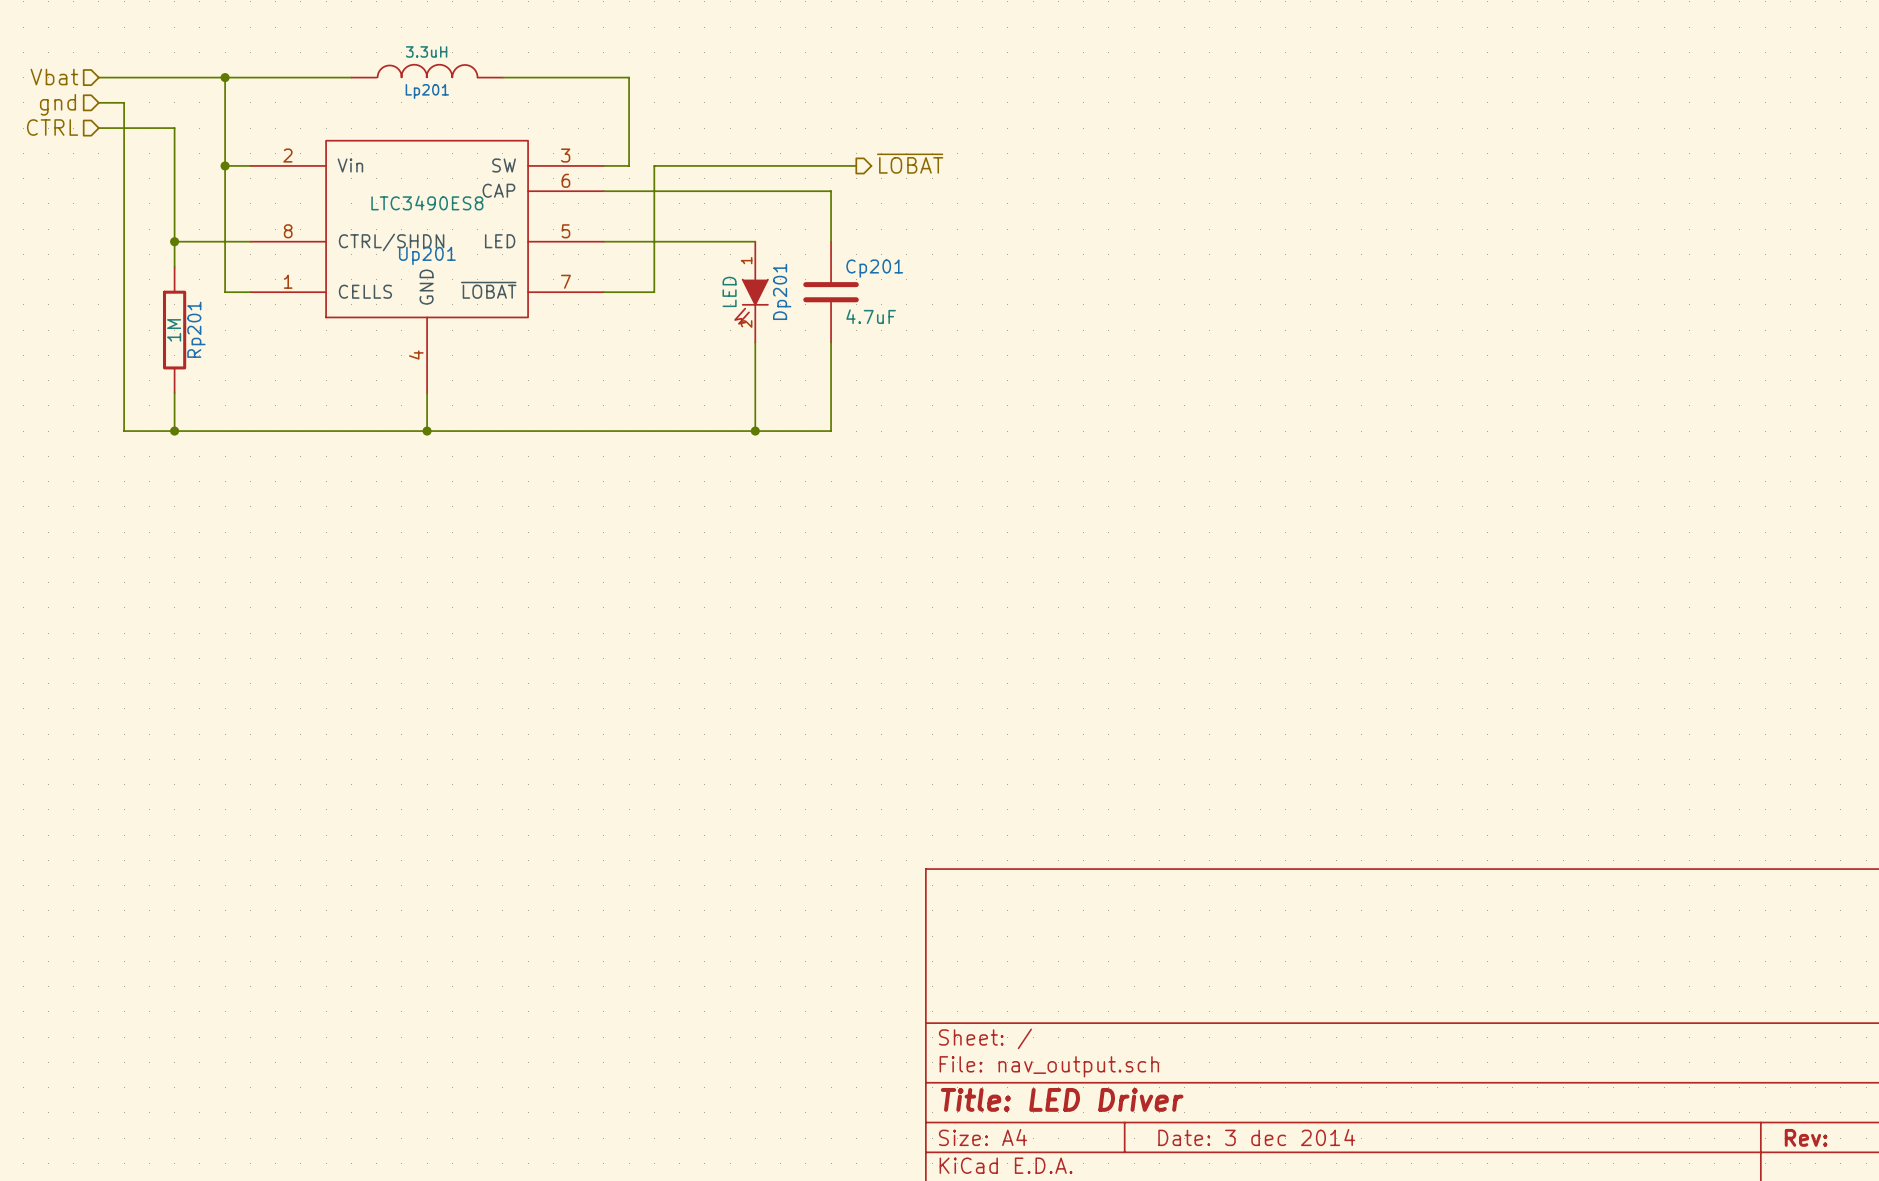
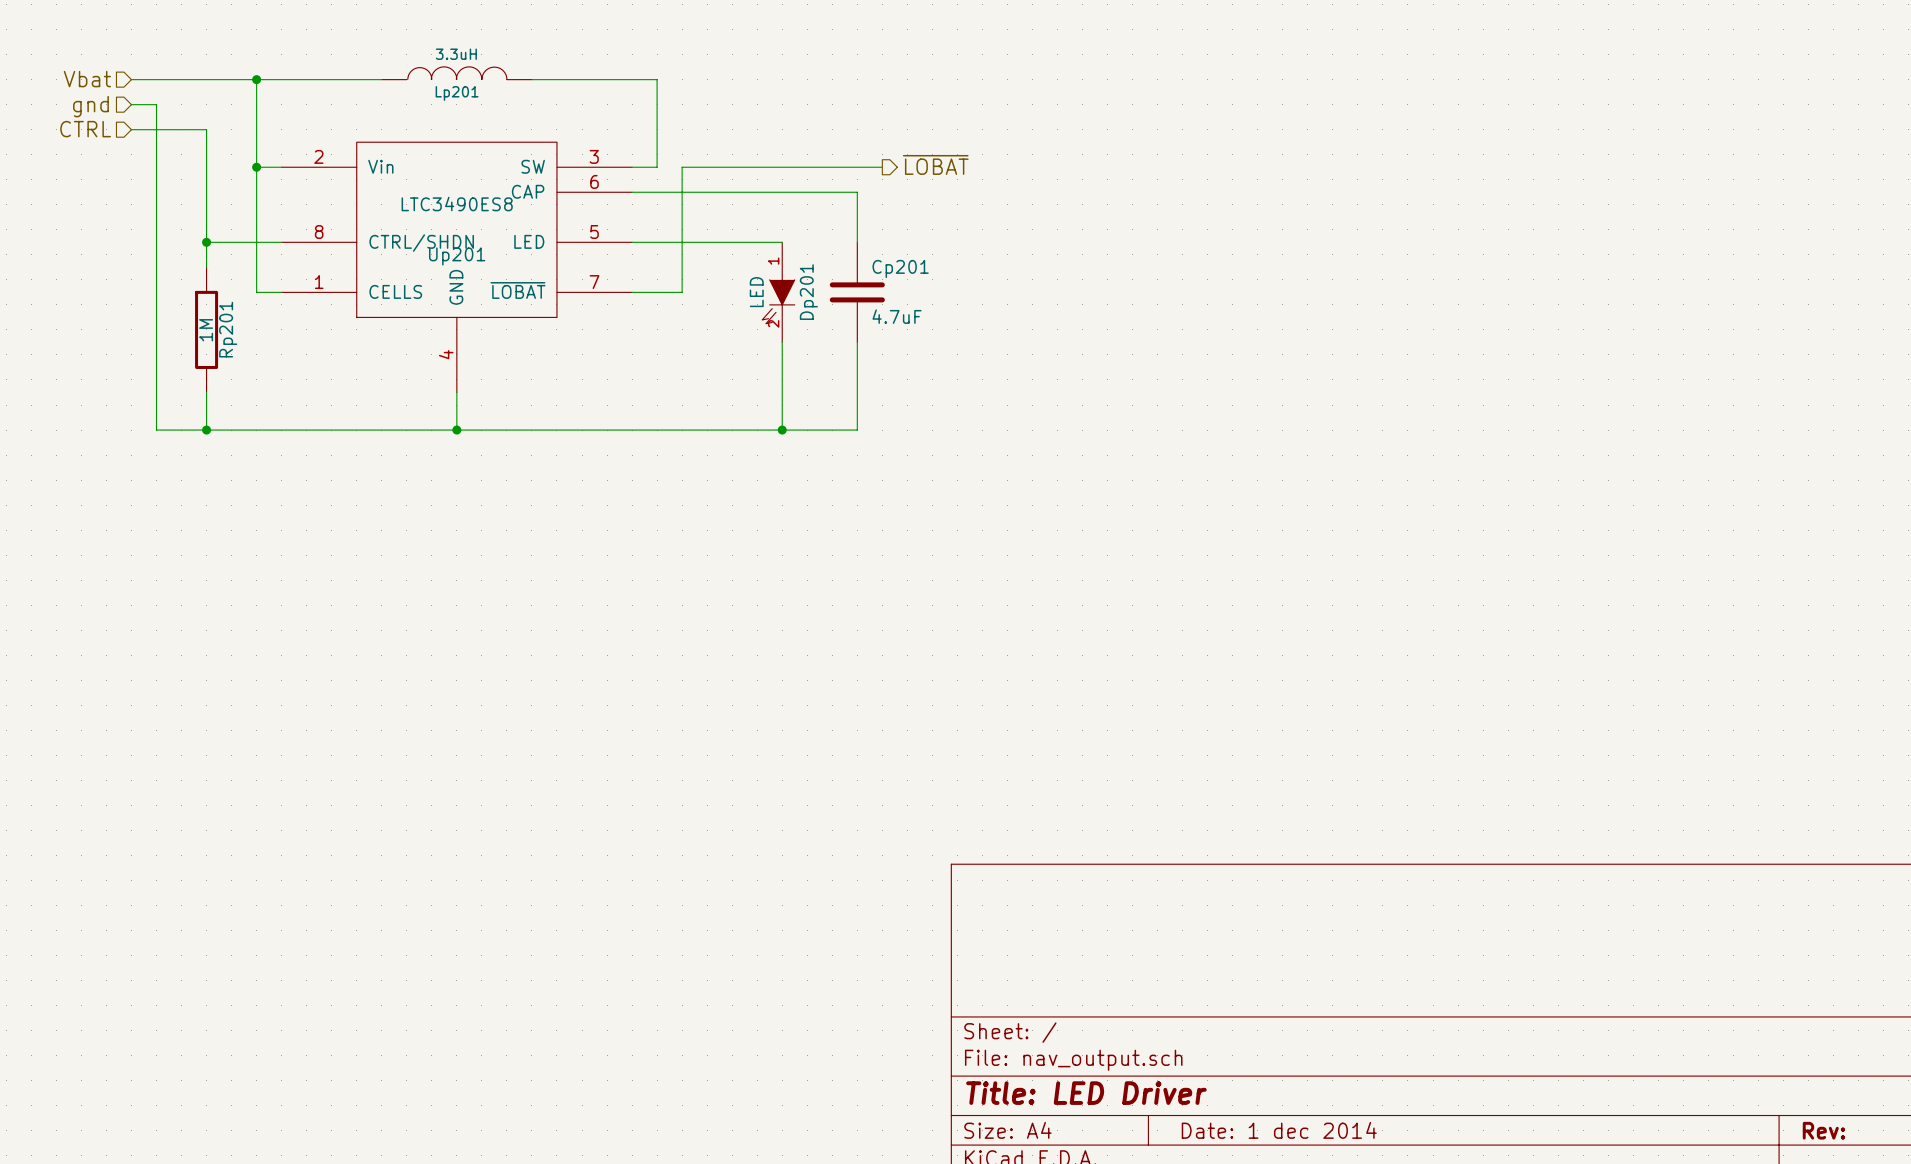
title block: Date: 3 dec 2014 (1256, 1137) -> Date: 1 dec 2014 (1279, 1130)

